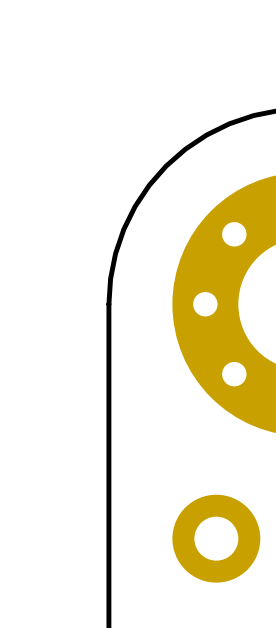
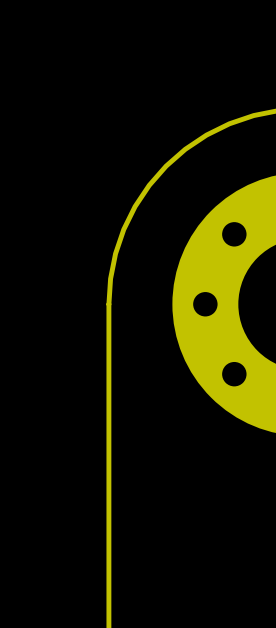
part: (216, 538) -> none

